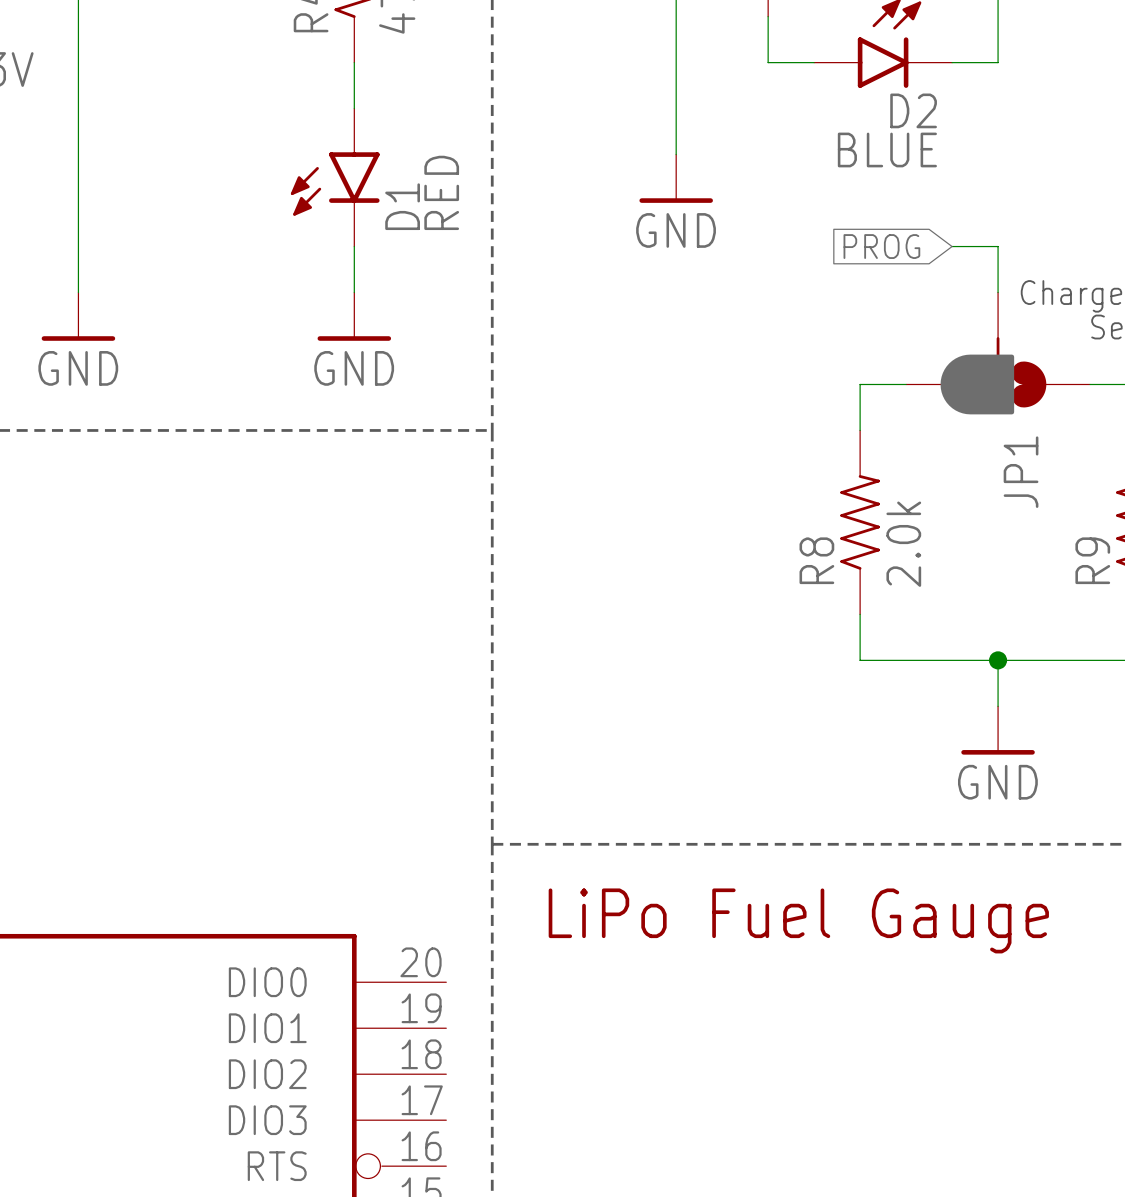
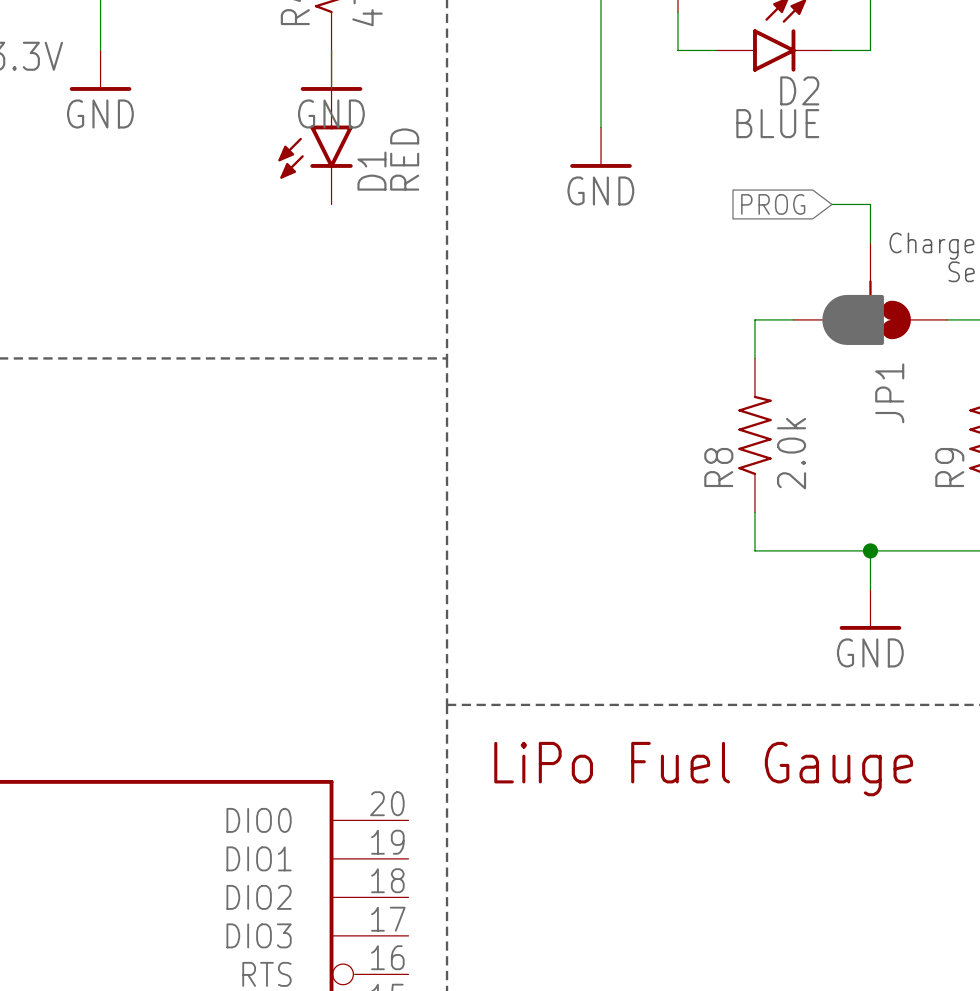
wire: (78, 62) (78, 292) -> none
power symbol: none -> GND (100, 70)
power symbol: none -> GND (331, 70)
wire: (354, 246) (354, 292) -> none
power symbol: GND (78, 316) -> none
power symbol: GND (354, 316) -> none

